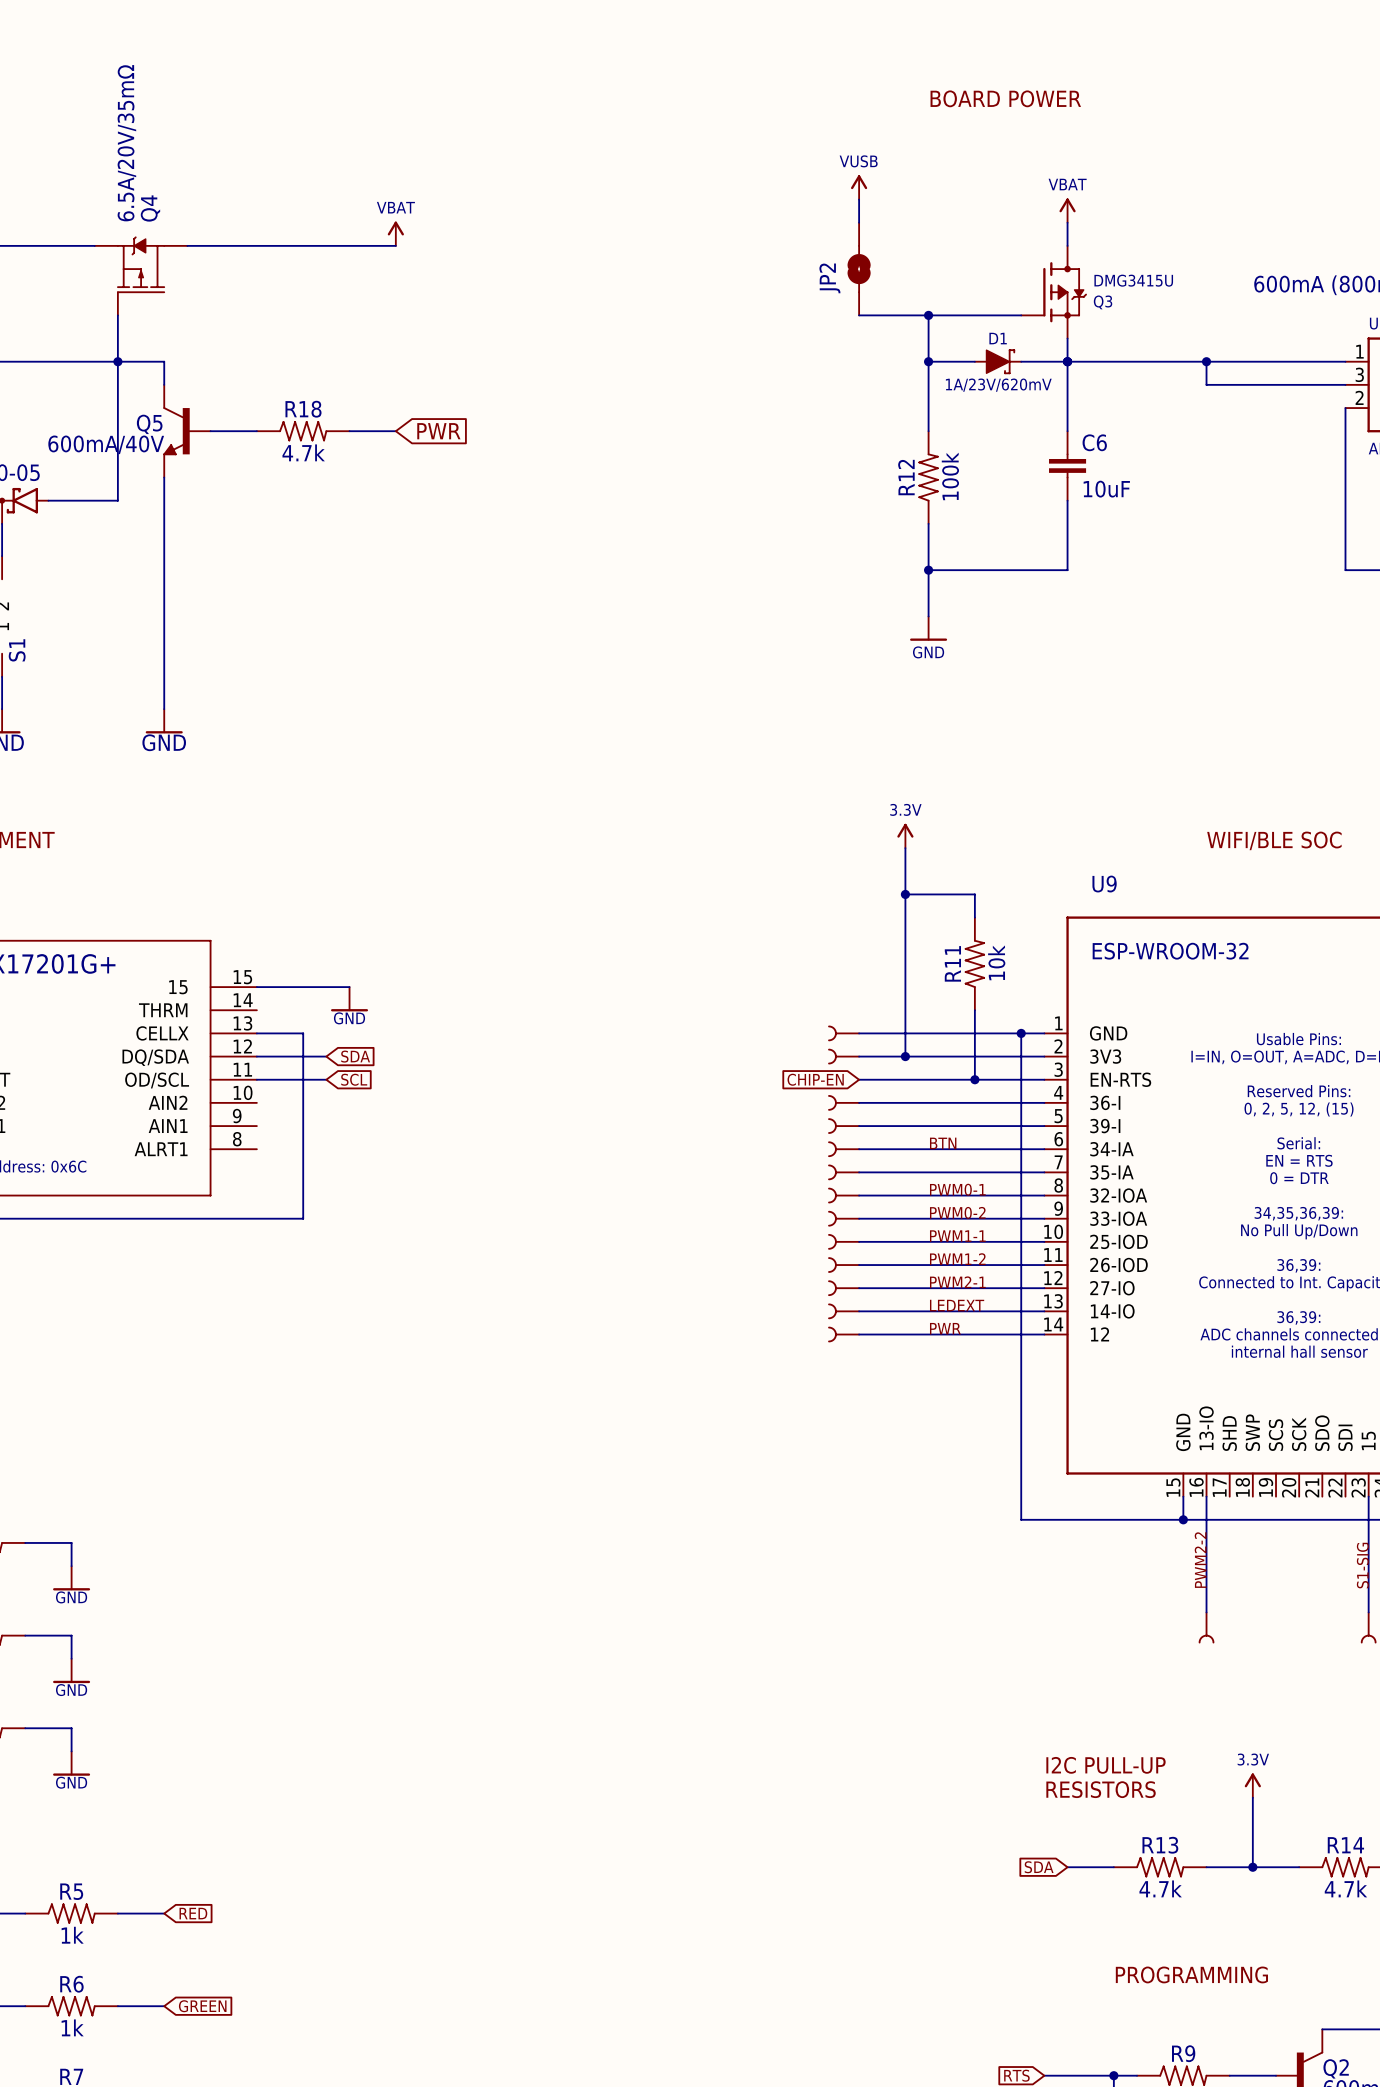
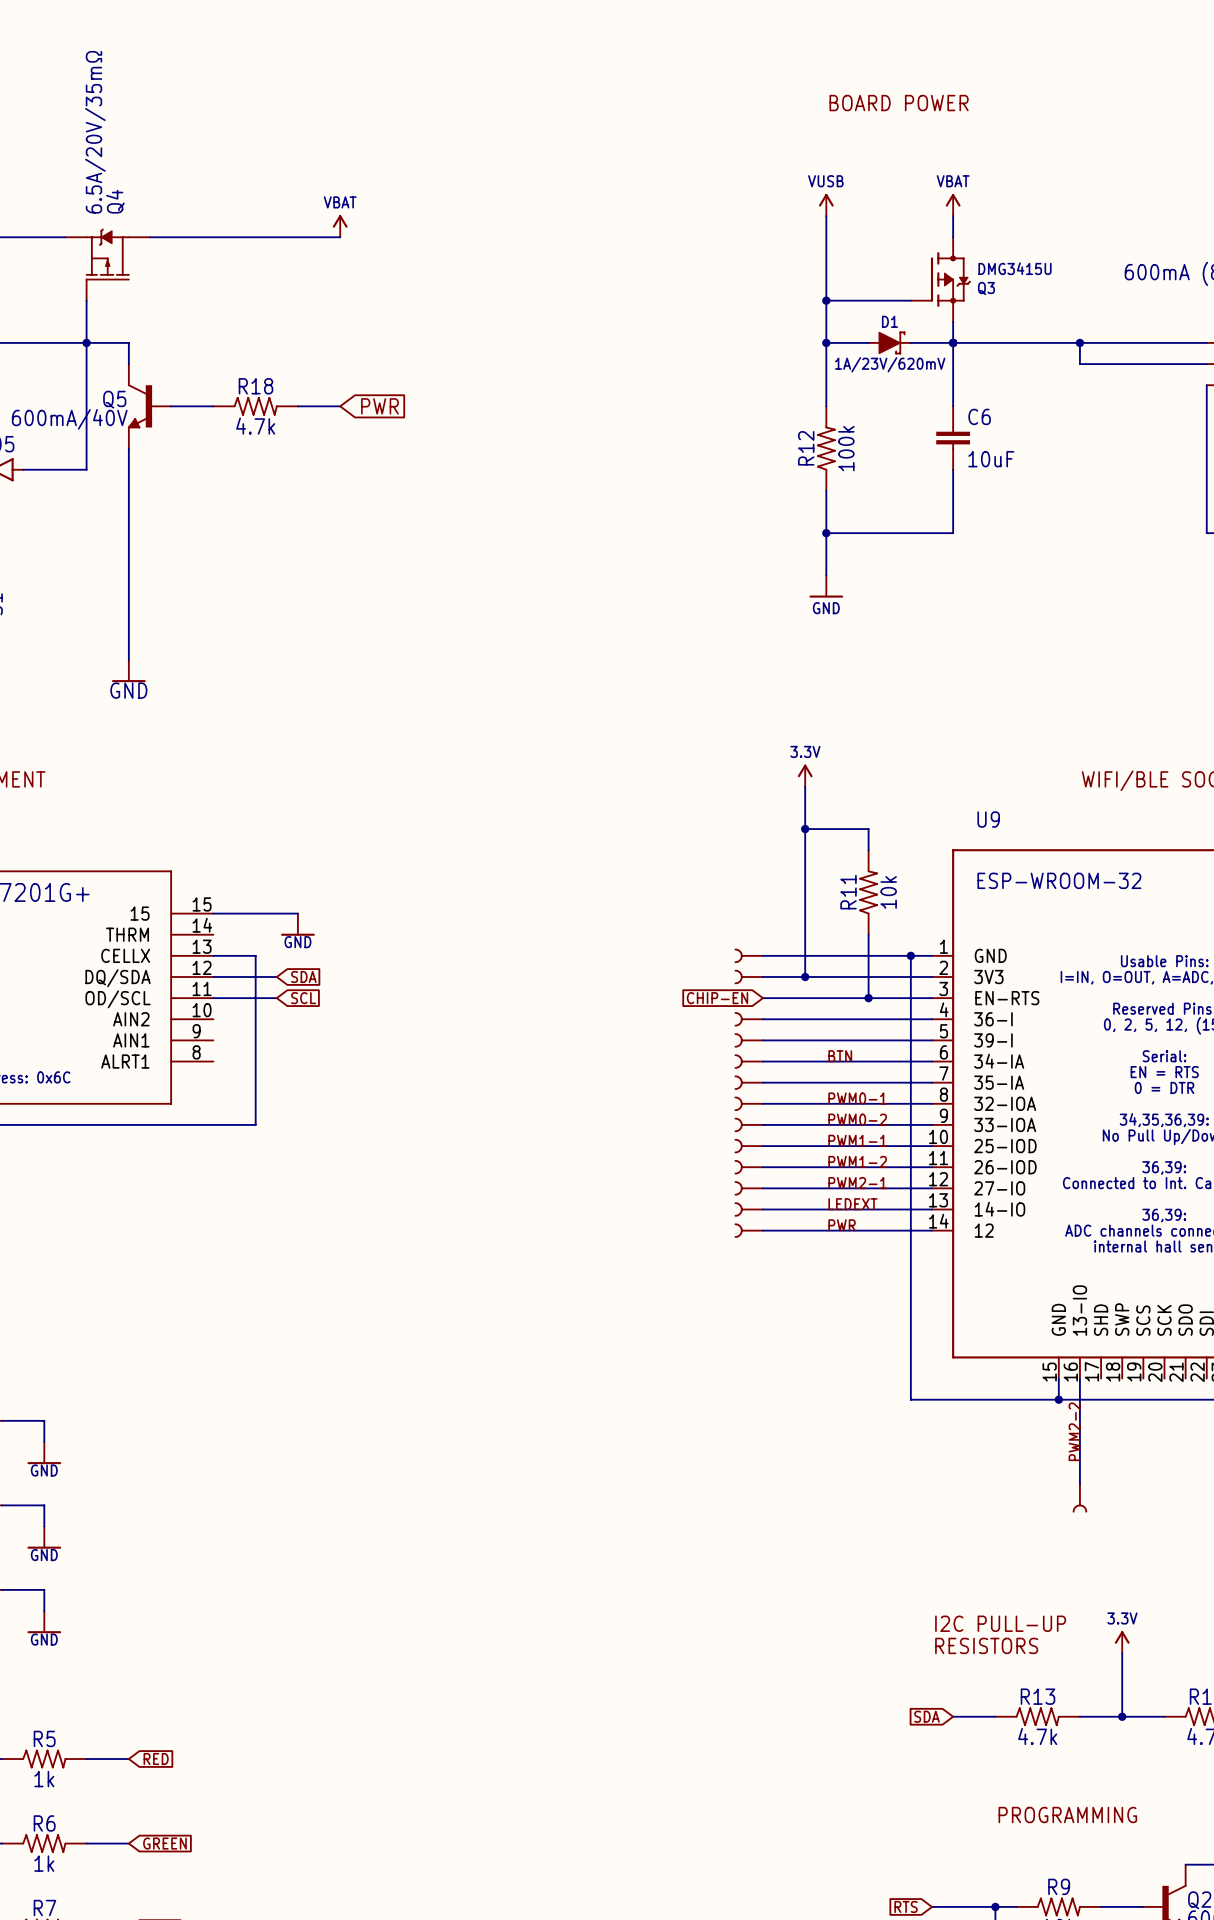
power symbol position: VUSB (859, 187) -> VUSB (826, 205)
wire: (859, 199) (859, 222) -> none
JP2: (859, 269) -> none
wire: (859, 315) (928, 315) -> (826, 216) (826, 300)

